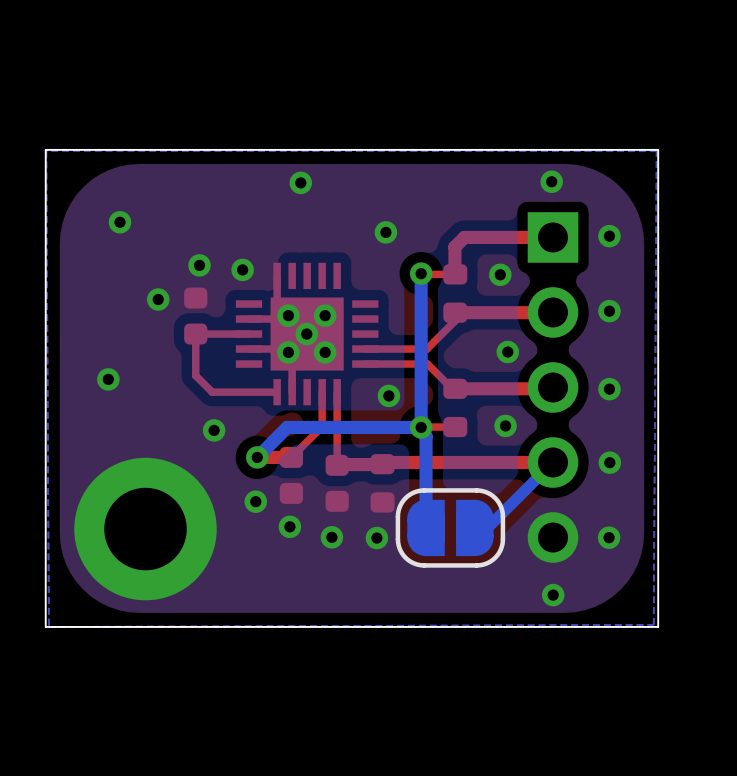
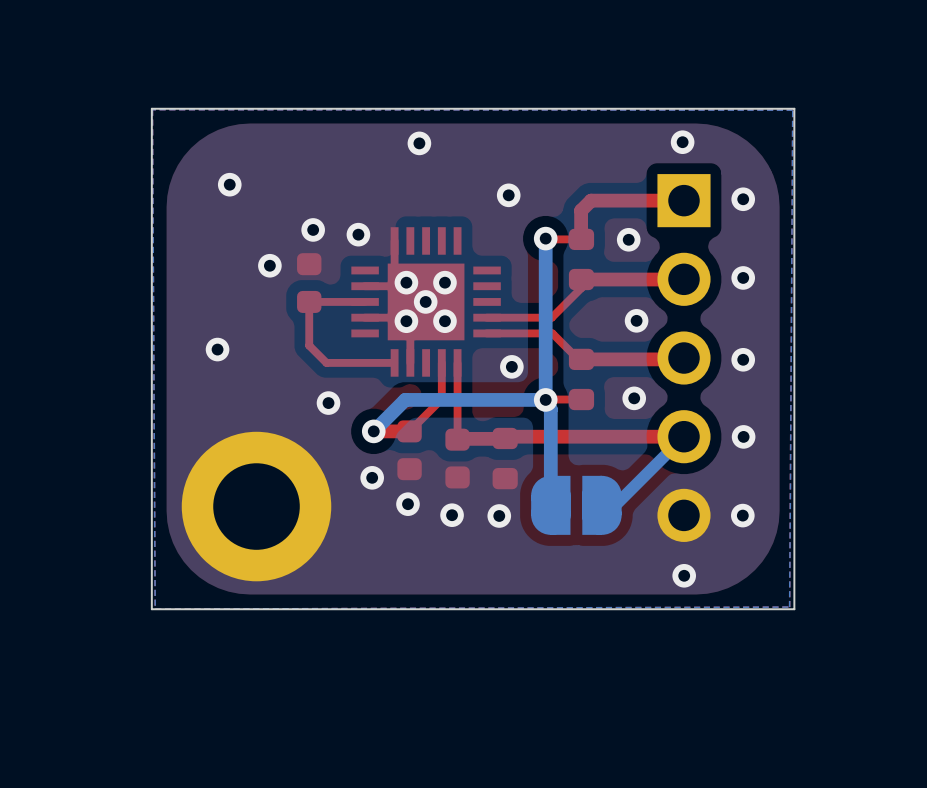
part footprint: [395, 488, 506, 568] -> [531, 475, 622, 535]

